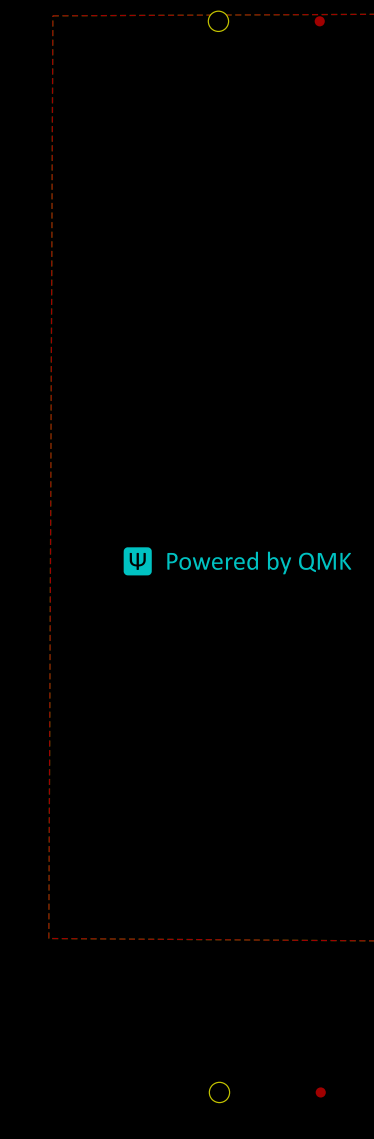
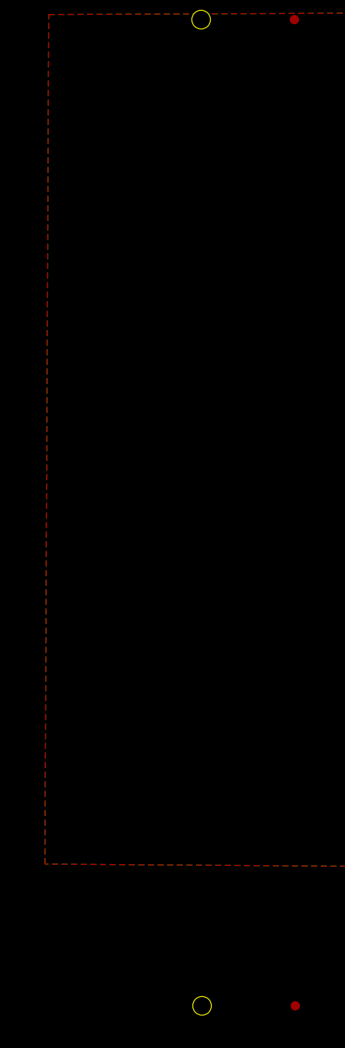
drawing: [123, 547, 352, 576] -> none

